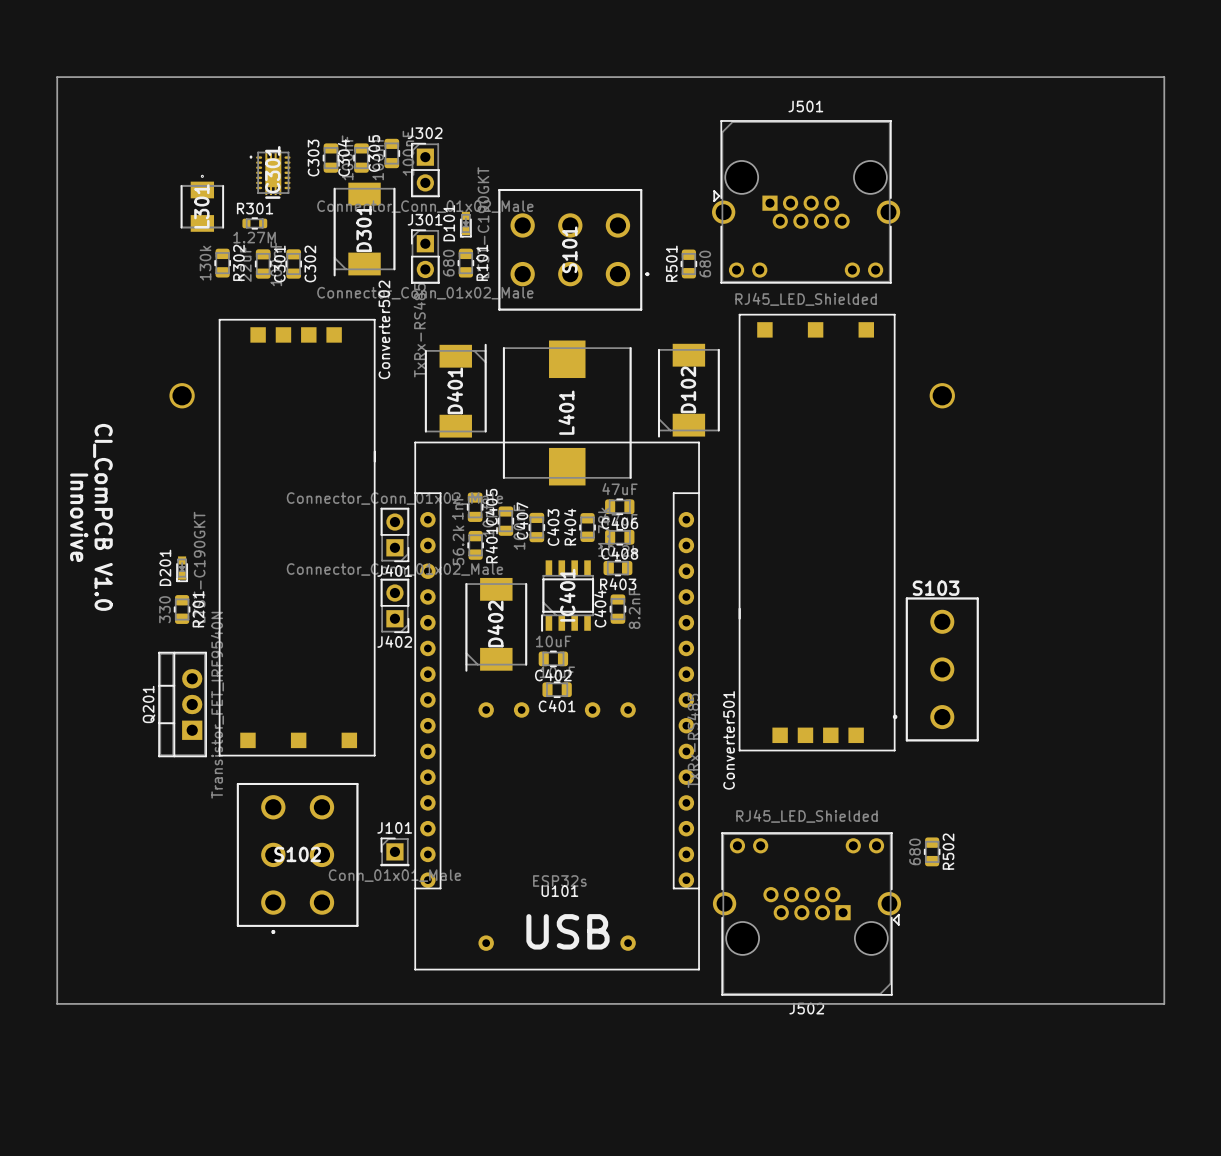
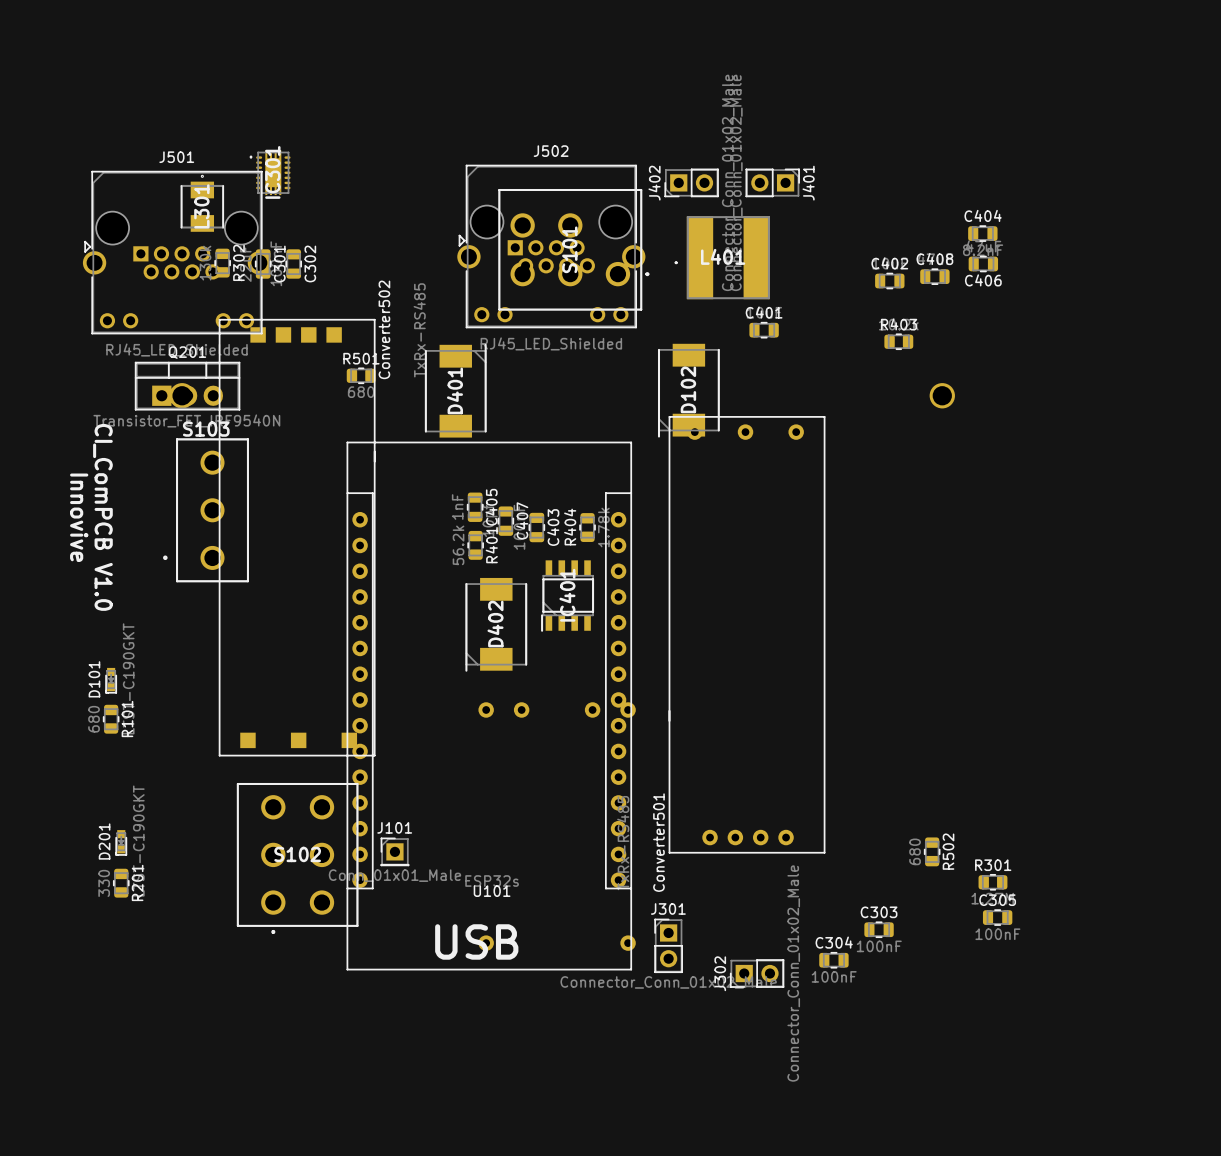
board edge: (57, 77) (57, 1003) (1164, 1003) (1164, 77) (57, 77) -> none
C305 rotation: 0° (391, 153) -> 90° clockwise (997, 917)
C305 position: (391, 153) -> (997, 917)
C303 rotation: 0° (330, 158) -> 90° clockwise (879, 929)
C303 position: (330, 158) -> (879, 929)
C304 rotation: 0° (361, 158) -> 90° clockwise (833, 960)
C304 position: (361, 158) -> (833, 960)
J302 rotation: 0° (425, 170) -> 90° counterclockwise (757, 973)
J302 position: (425, 170) -> (757, 973)
J501 position: (806, 201) -> (176, 252)
R301 footprint: [242, 217, 268, 230] -> [978, 874, 1008, 891]
D101 position: (465, 224) -> (111, 680)
D301: (364, 229) -> none
J301 position: (425, 256) -> (668, 945)
R101 position: (465, 263) -> (111, 719)
R501 rotation: 0° (688, 263) -> 90° clockwise (361, 375)
R501 position: (688, 263) -> (361, 375)
Converter501 footprint: [738, 314, 896, 752] -> [668, 416, 826, 854]
L401 footprint: [502, 340, 632, 486] -> [674, 216, 770, 300]
C406 position: (619, 506) -> (983, 263)
J401 rotation: 0° (394, 534) -> 90° counterclockwise (772, 182)
J401 position: (394, 534) -> (772, 182)
C408 position: (619, 537) -> (934, 276)
C408 name position: C408 (619, 553) -> C408 (934, 259)
R403 position: (617, 568) -> (898, 341)
D201 position: (182, 569) -> (121, 842)
R403 name position: R403 (618, 584) -> R403 (899, 324)
J402 rotation: 0° (394, 605) -> 90° clockwise (691, 182)
J402 position: (394, 605) -> (691, 182)
R201 position: (182, 609) -> (121, 883)
C404 rotation: 0° (617, 609) -> 90° clockwise (982, 233)
C404 position: (617, 609) -> (982, 233)
C402 position: (553, 658) -> (889, 281)
S103 position: (935, 669) -> (206, 510)
C402 name position: C402 (553, 675) -> C402 (889, 263)
C401 position: (557, 689) -> (764, 330)
Q201 rotation: 0° (182, 704) -> 90° clockwise (187, 386)
Q201 position: (182, 704) -> (187, 386)
C401 name position: C401 (557, 706) -> C401 (764, 312)
U101 position: (557, 706) -> (489, 706)
J502 rotation: 0° (806, 913) -> 180° (551, 246)
J502 position: (806, 913) -> (551, 246)
text position: USB (567, 931) -> USB (476, 941)

